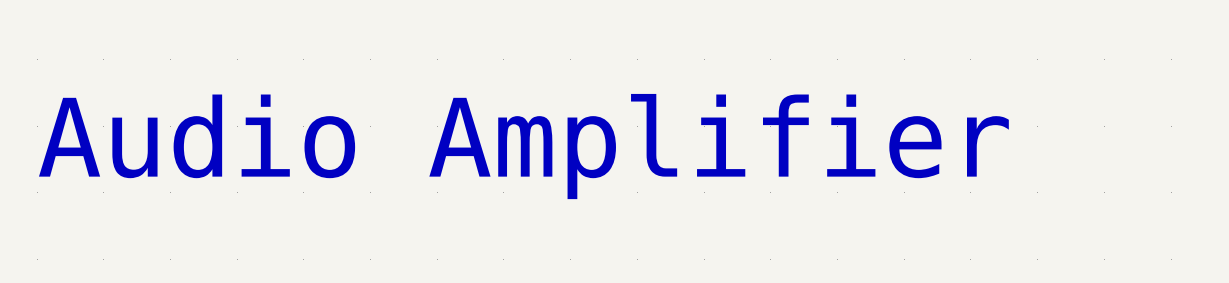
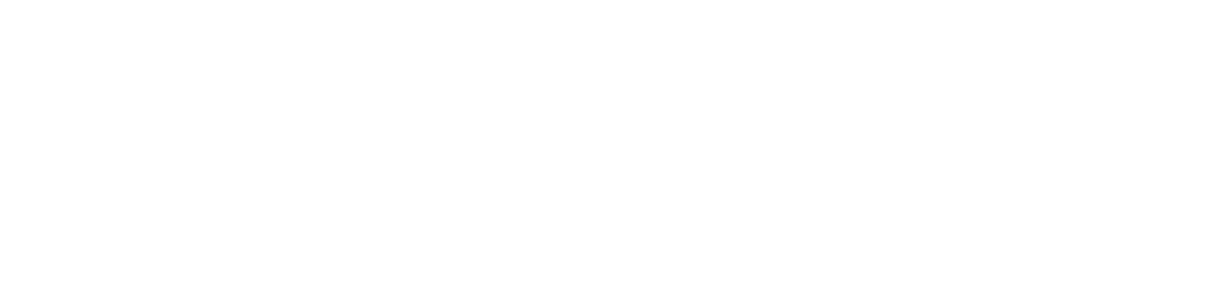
text: Audio Amplifier (523, 146) -> none

